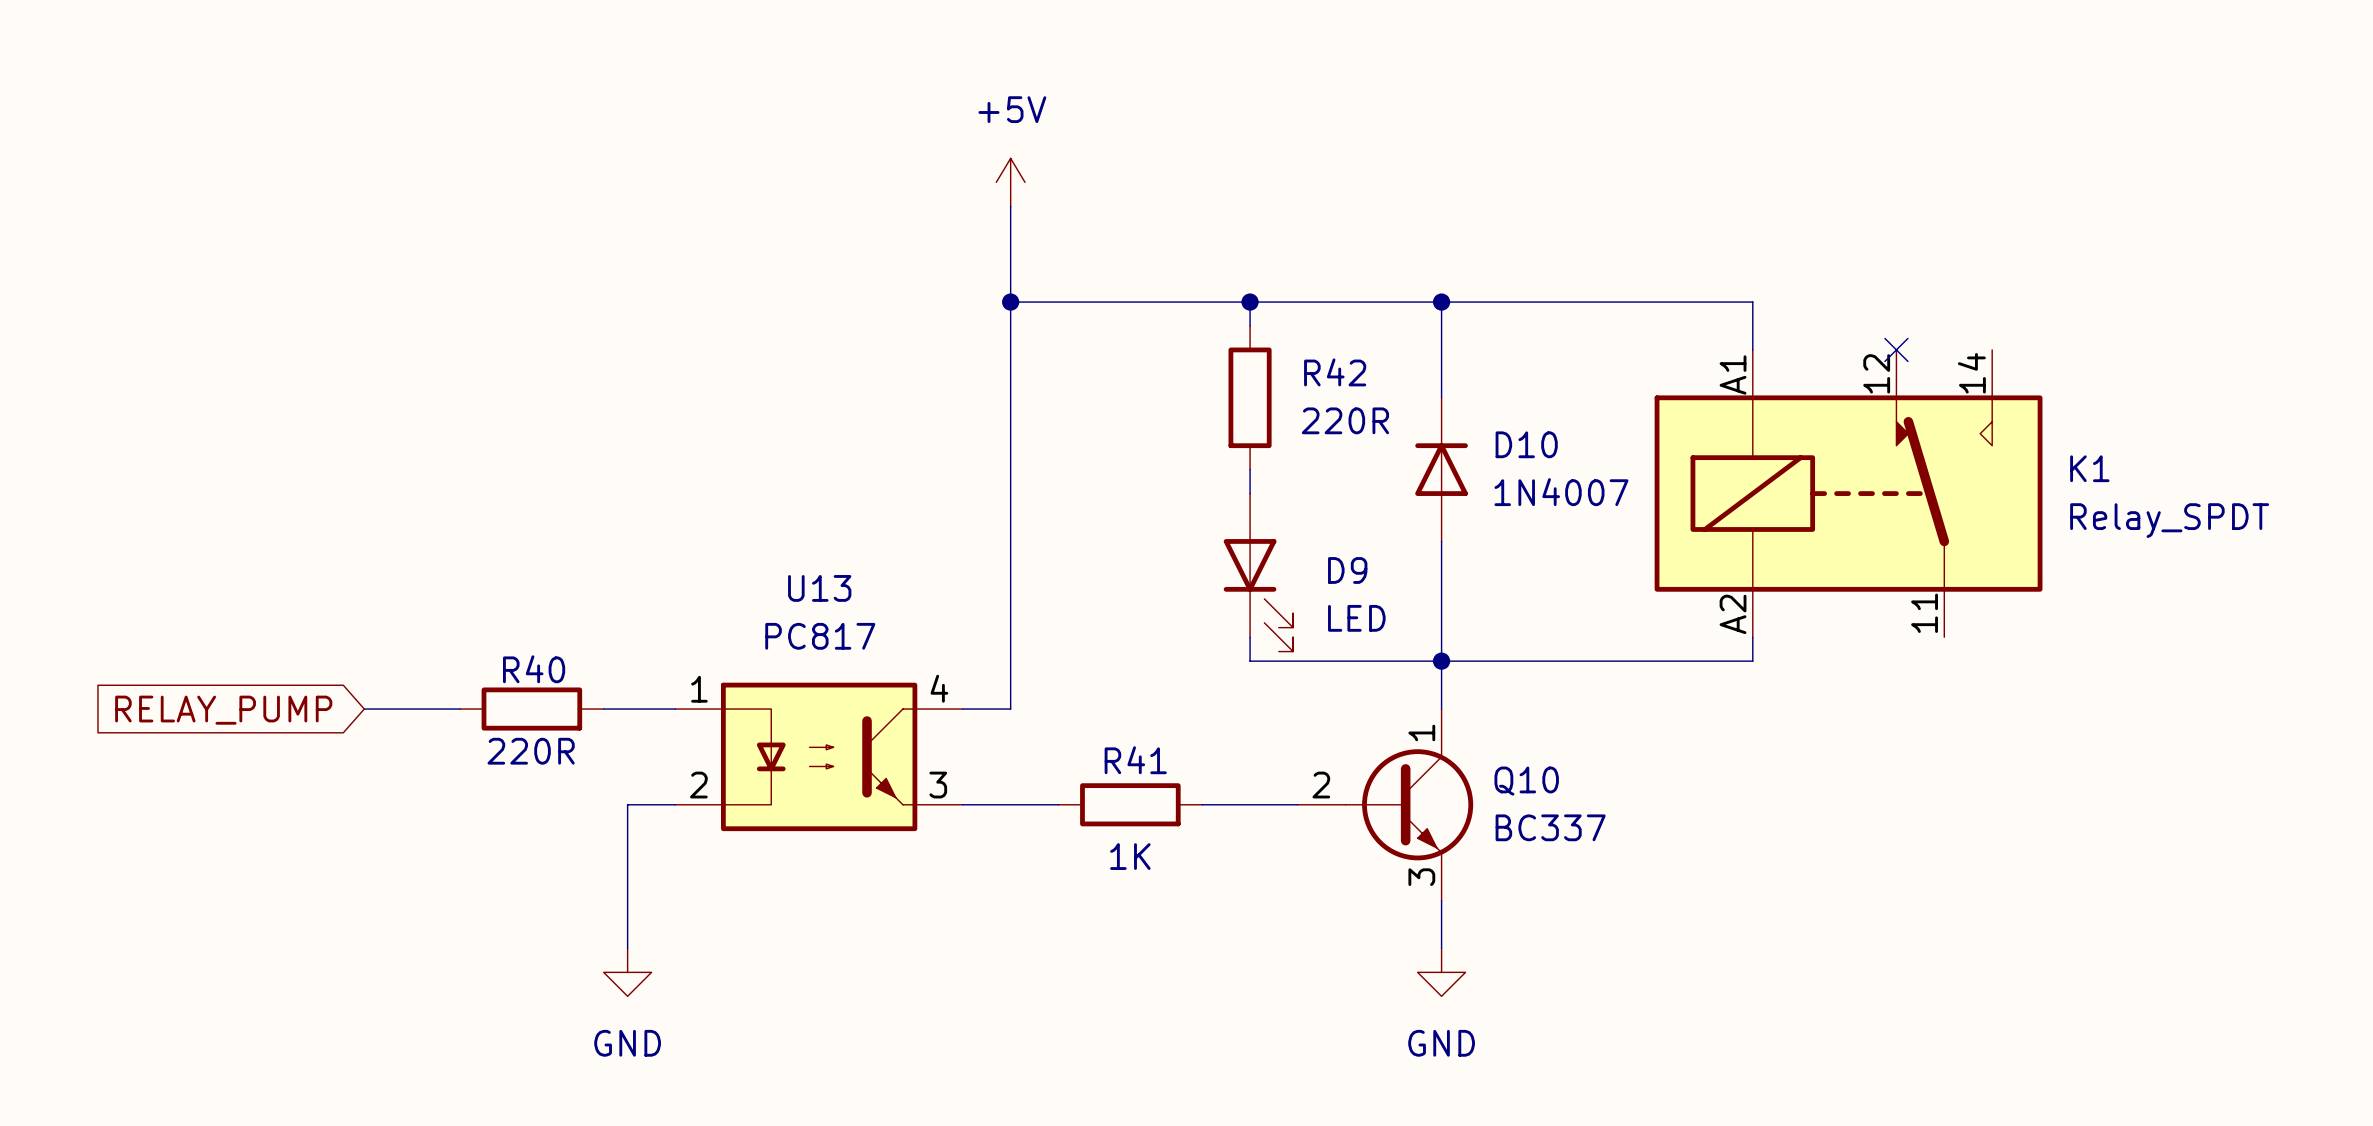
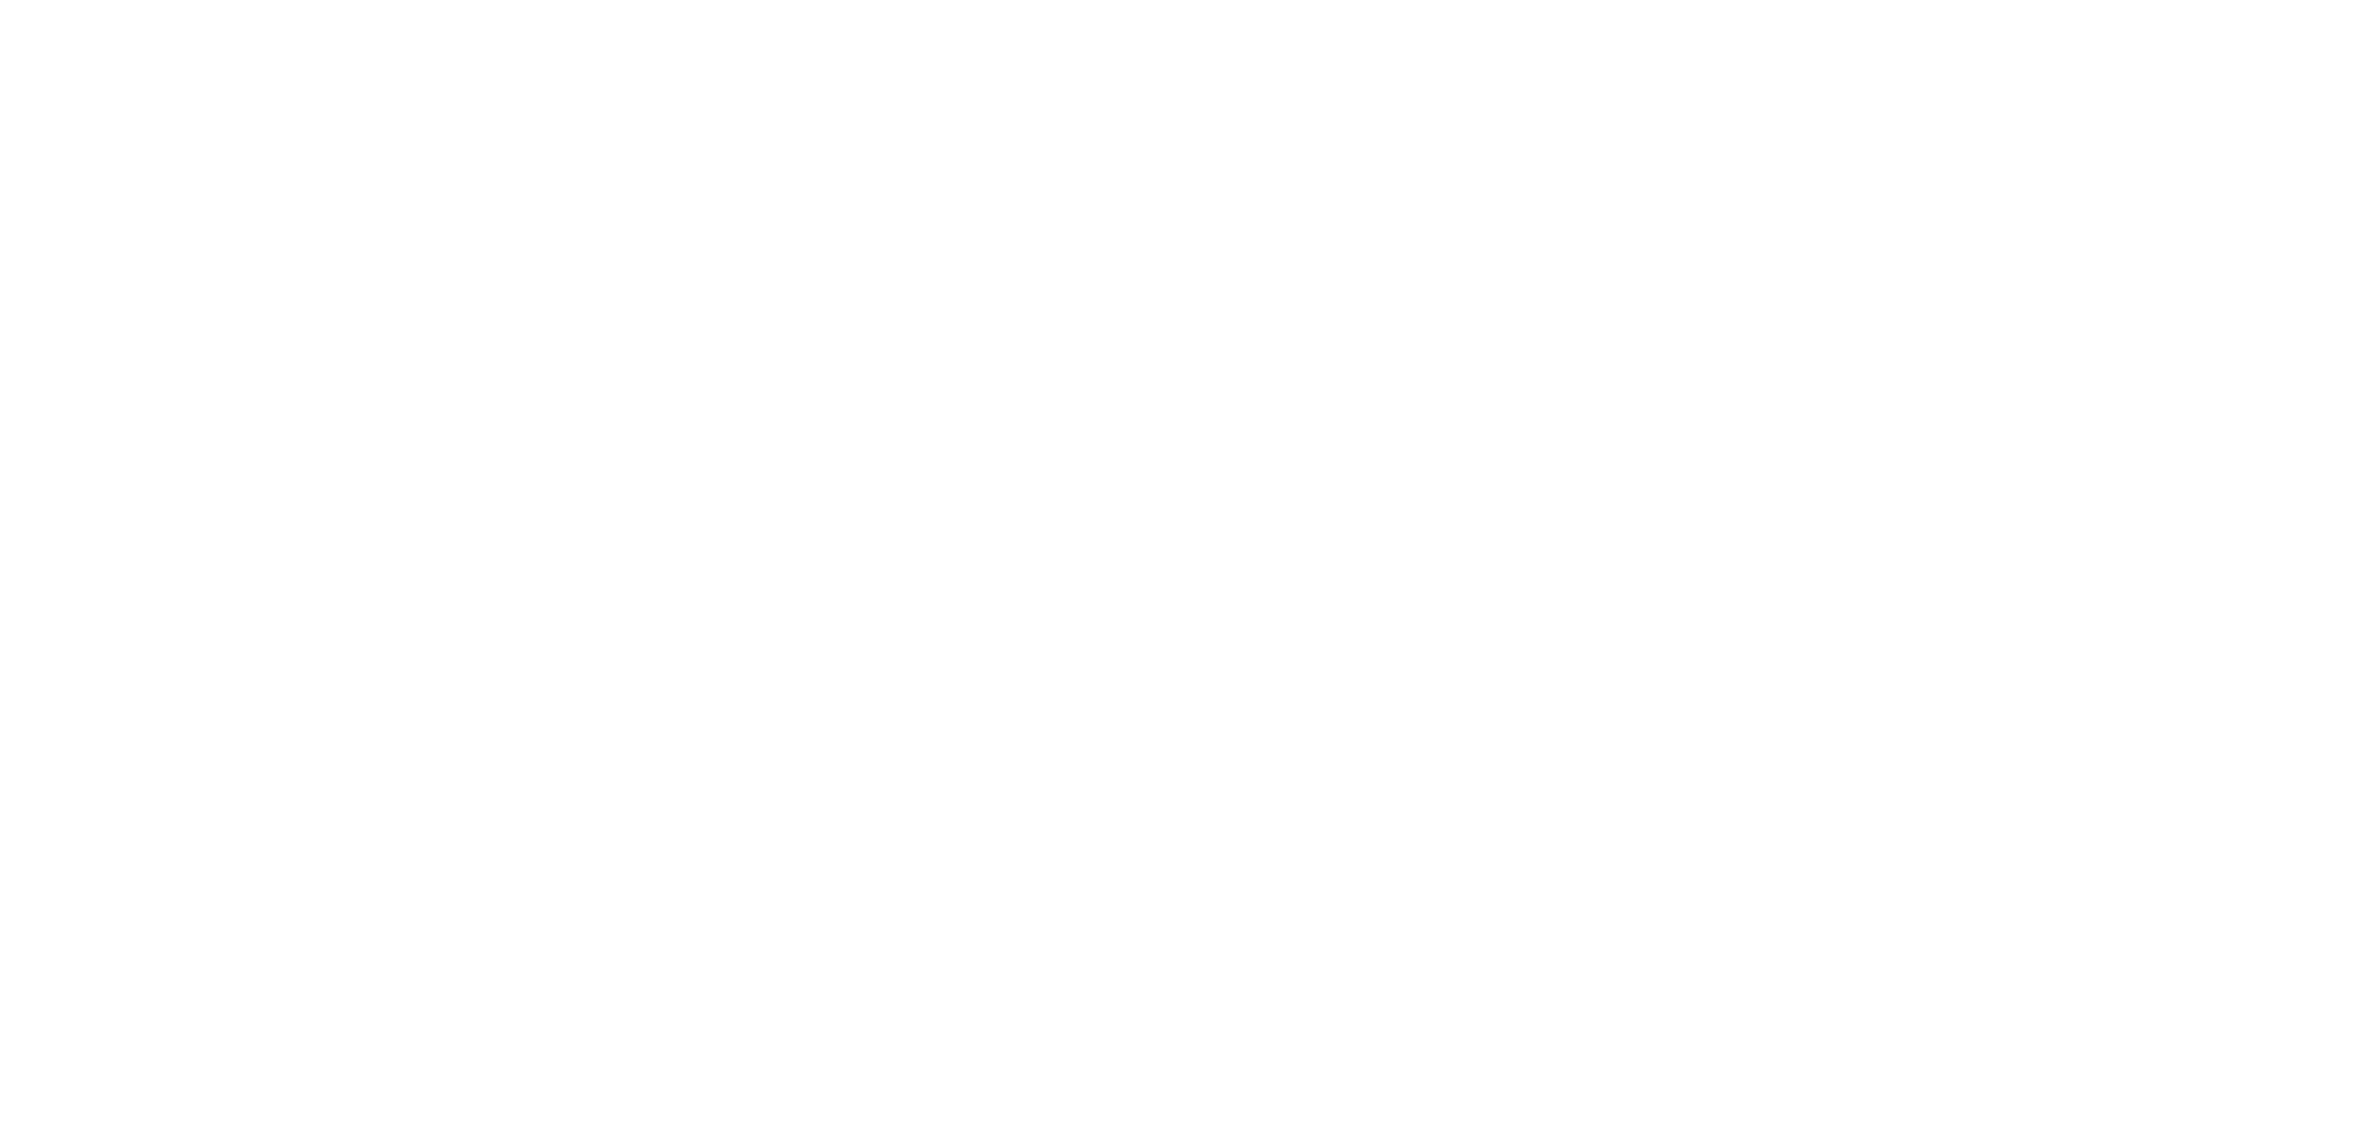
power symbol: +5V (1010, 182) -> none
wire: (1010, 206) (1010, 709) (962, 709) -> none
wire: (1010, 302) (1752, 302) (1752, 349) -> none
junction: (1010, 302) -> none
wire: (1250, 302) (1250, 325) -> none
junction: (1250, 302) -> none
wire: (1441, 302) (1441, 397) -> none
junction: (1441, 302) -> none
no-connect mark: (1896, 349) -> none
R42: 220R (1250, 397) -> none
wire: (1250, 469) (1250, 493) -> none
D10: 1N4007 (1441, 469) -> none
K1: Relay_SPDT (1848, 493) -> none
wire: (1441, 541) (1441, 709) -> none
D9: LED (1258, 572) -> none
wire: (1250, 637) (1250, 661) (1752, 661) (1752, 637) -> none
junction: (1441, 661) -> none
wire: (364, 709) (460, 709) -> none
R40: 220R (531, 709) -> none
wire: (603, 709) (675, 709) -> none
global label: RELAY_PUMP (223, 710) -> none
U13: PC817 (819, 756) -> none
wire: (675, 804) (627, 804) (627, 948) -> none
wire: (962, 804) (1058, 804) -> none
R41: 1K (1130, 804) -> none
wire: (1202, 804) (1297, 804) -> none
Q10: BC337 (1385, 804) -> none
wire: (1441, 900) (1441, 948) -> none
power symbol: GND (627, 972) -> none
power symbol: GND (1441, 972) -> none

